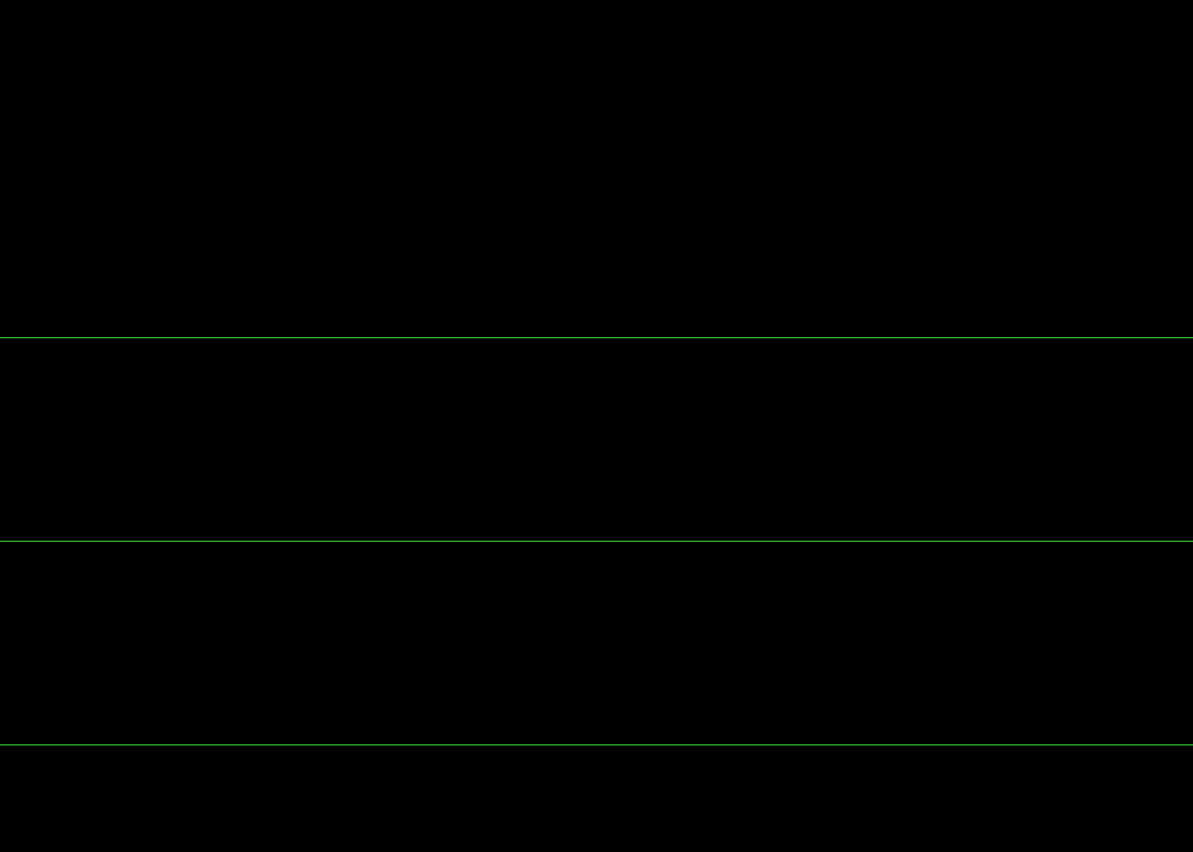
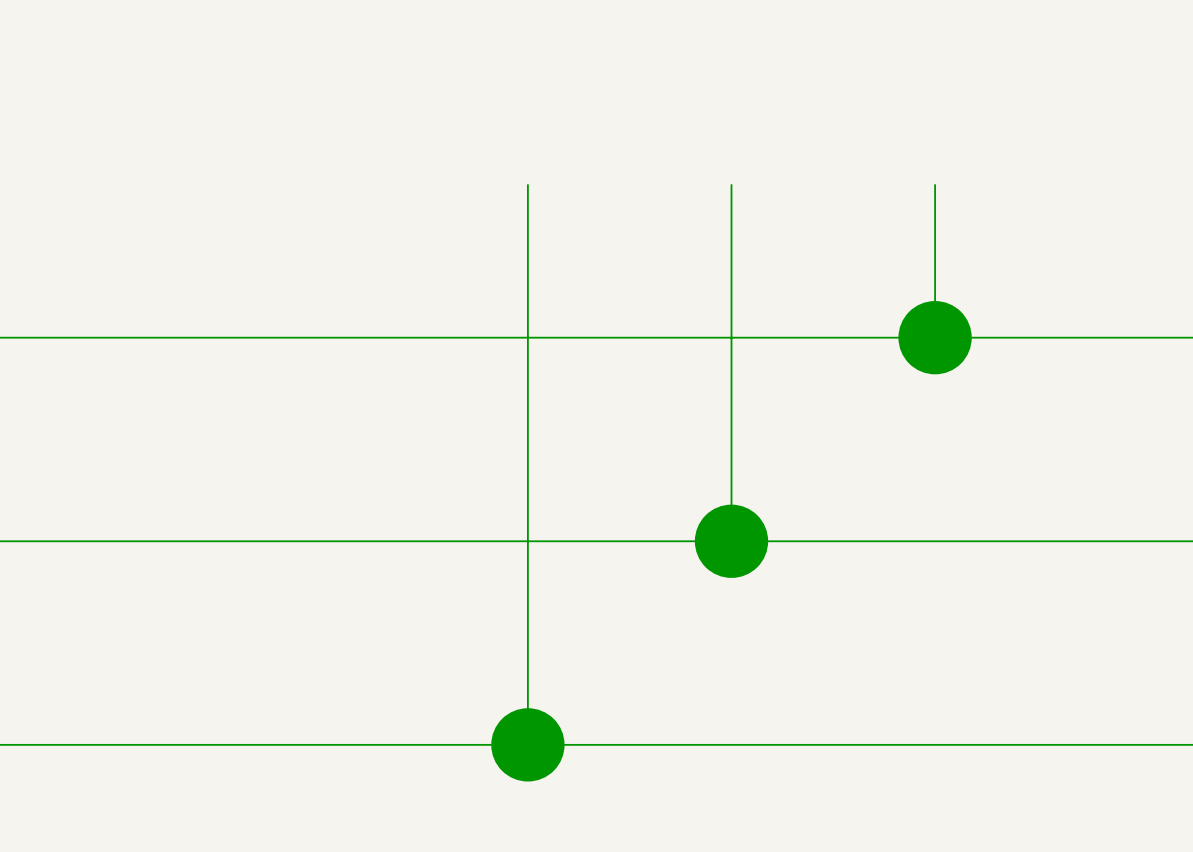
wire: none -> (527, 184) (527, 744)
wire: none -> (731, 184) (731, 541)
wire: none -> (935, 184) (935, 337)
junction: none -> (935, 337)
junction: none -> (731, 541)
junction: none -> (527, 744)

